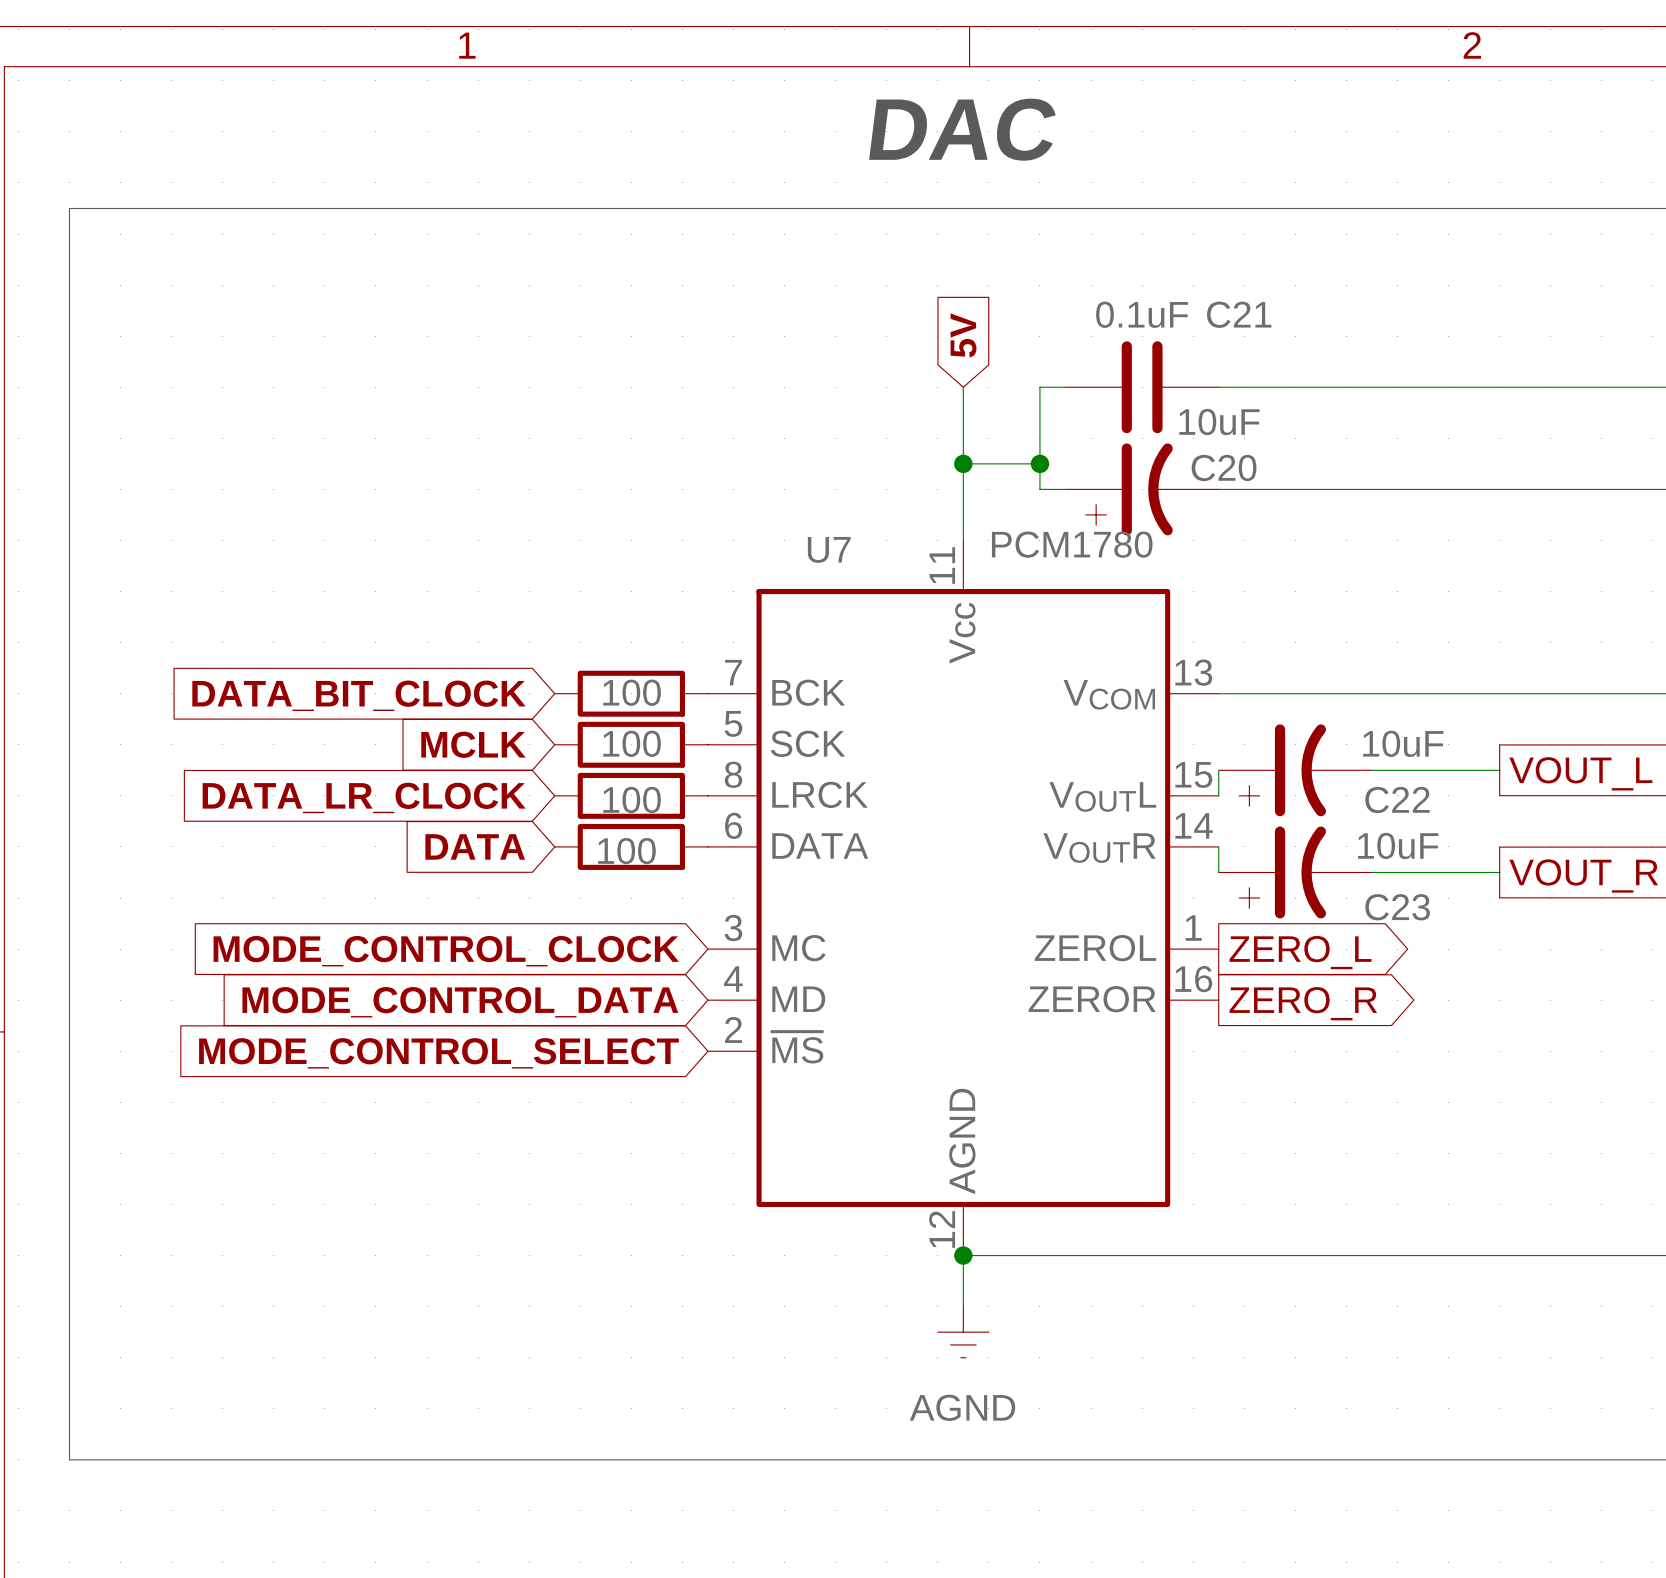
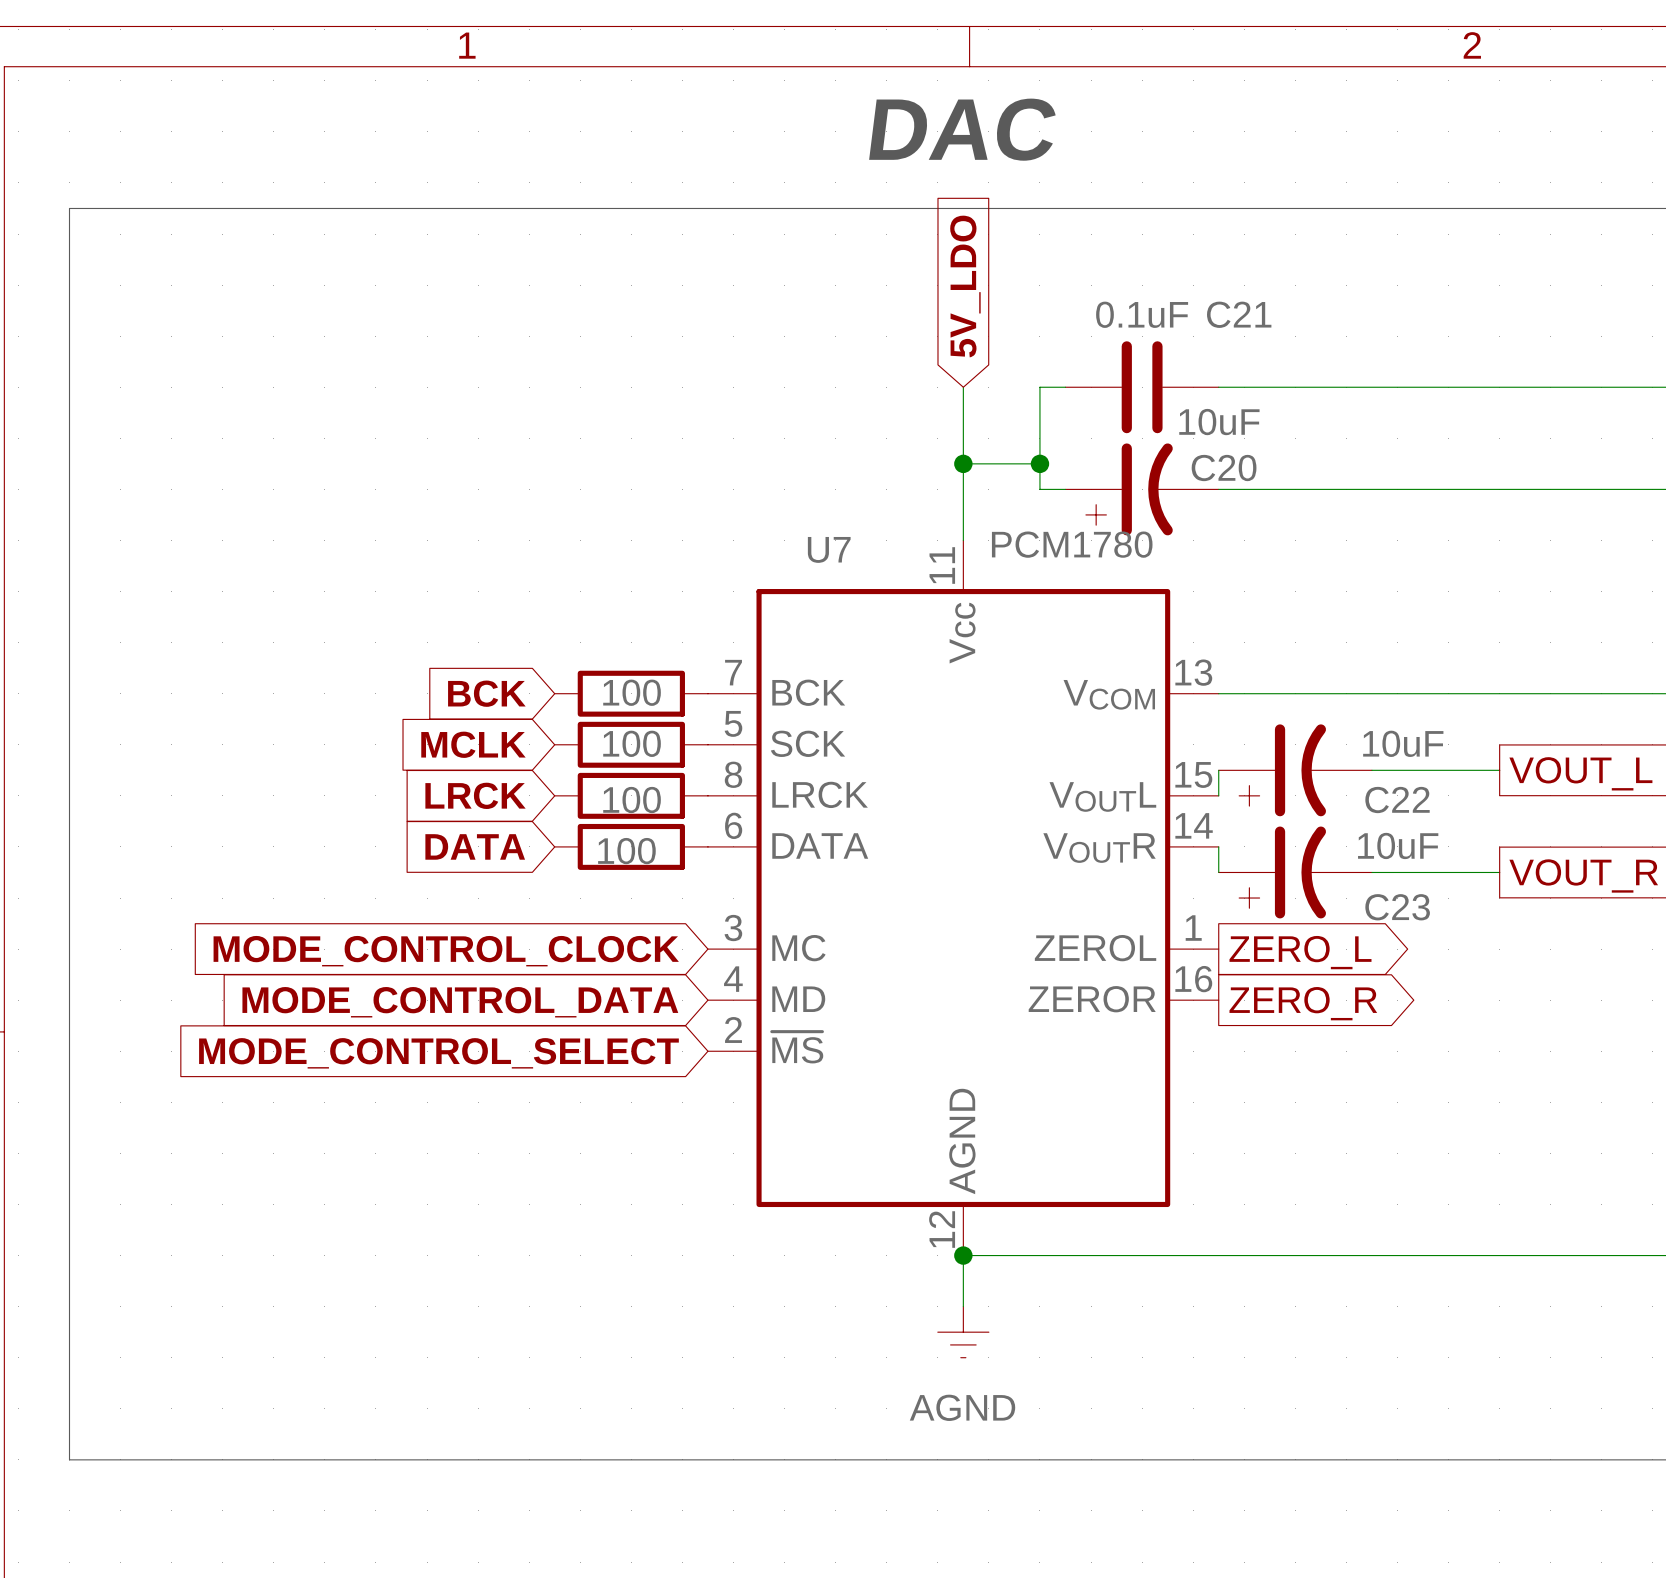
global label: 5V (963, 335) -> 5V_LDO (965, 286)
global label: DATA_BIT_CLOCK (358, 695) -> BCK (486, 693)
global label: DATA_LR_CLOCK (364, 797) -> LRCK (475, 795)

